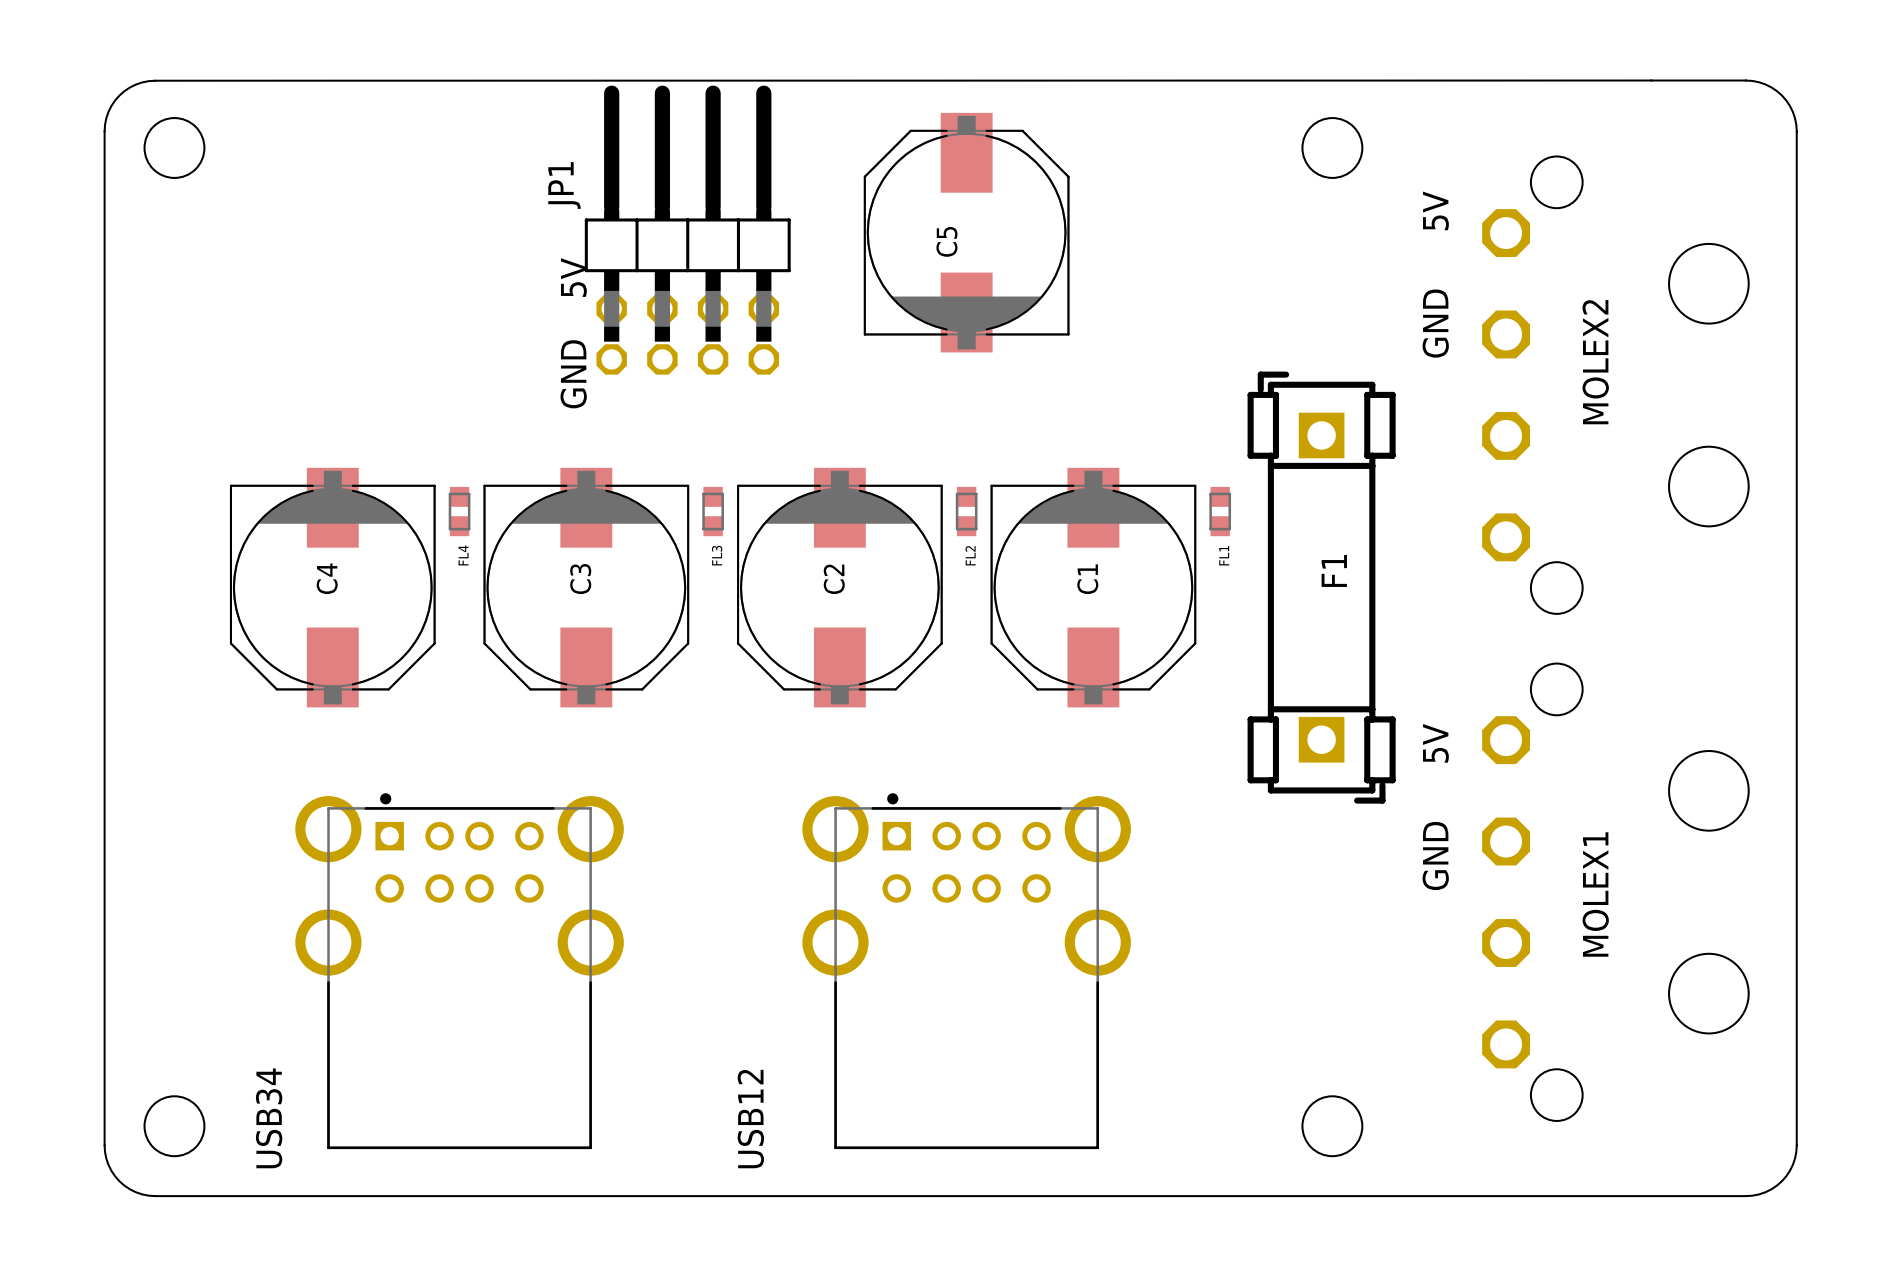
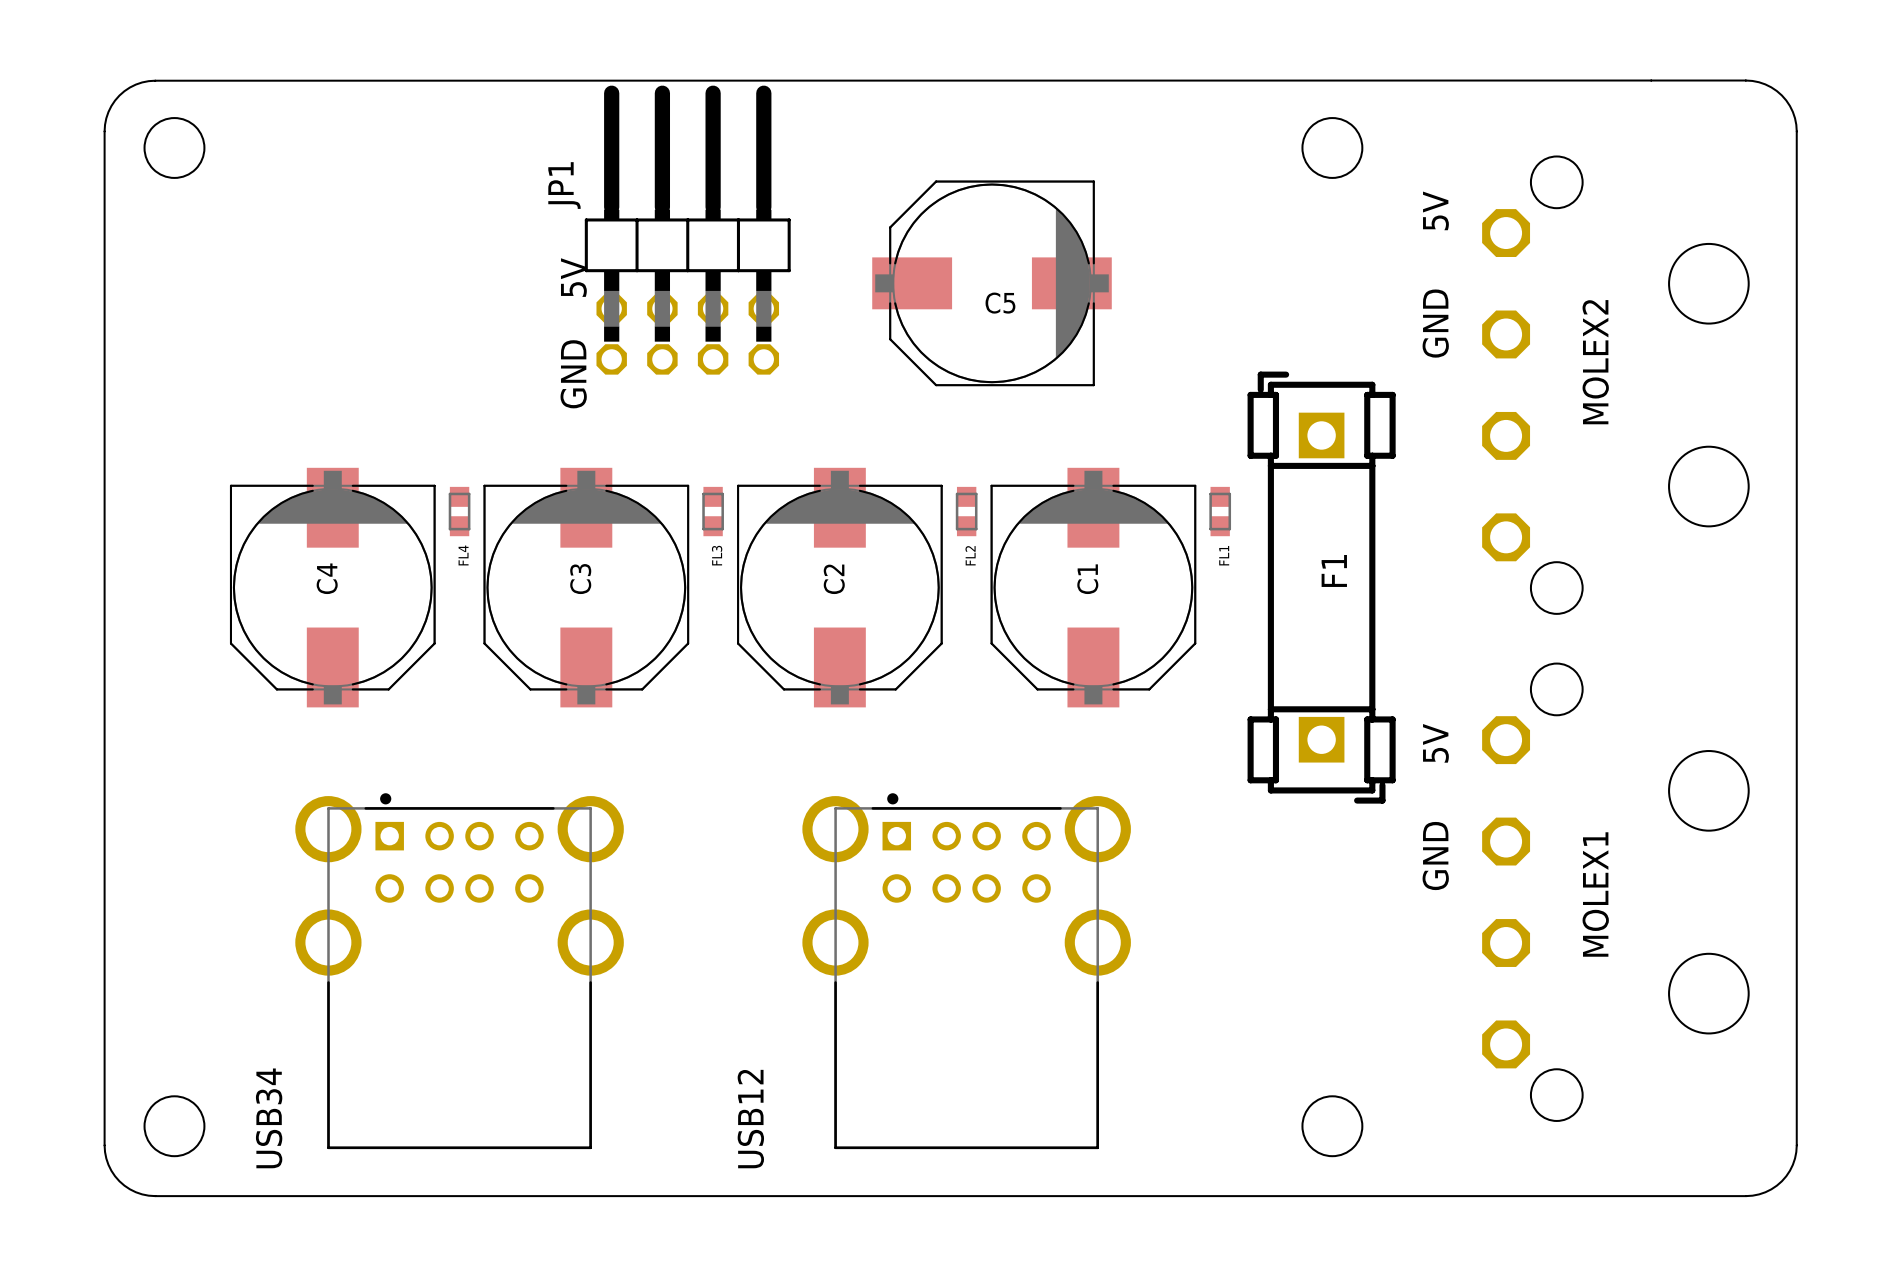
C5 rotation: 0° (966, 232) -> 90° counterclockwise (992, 283)

